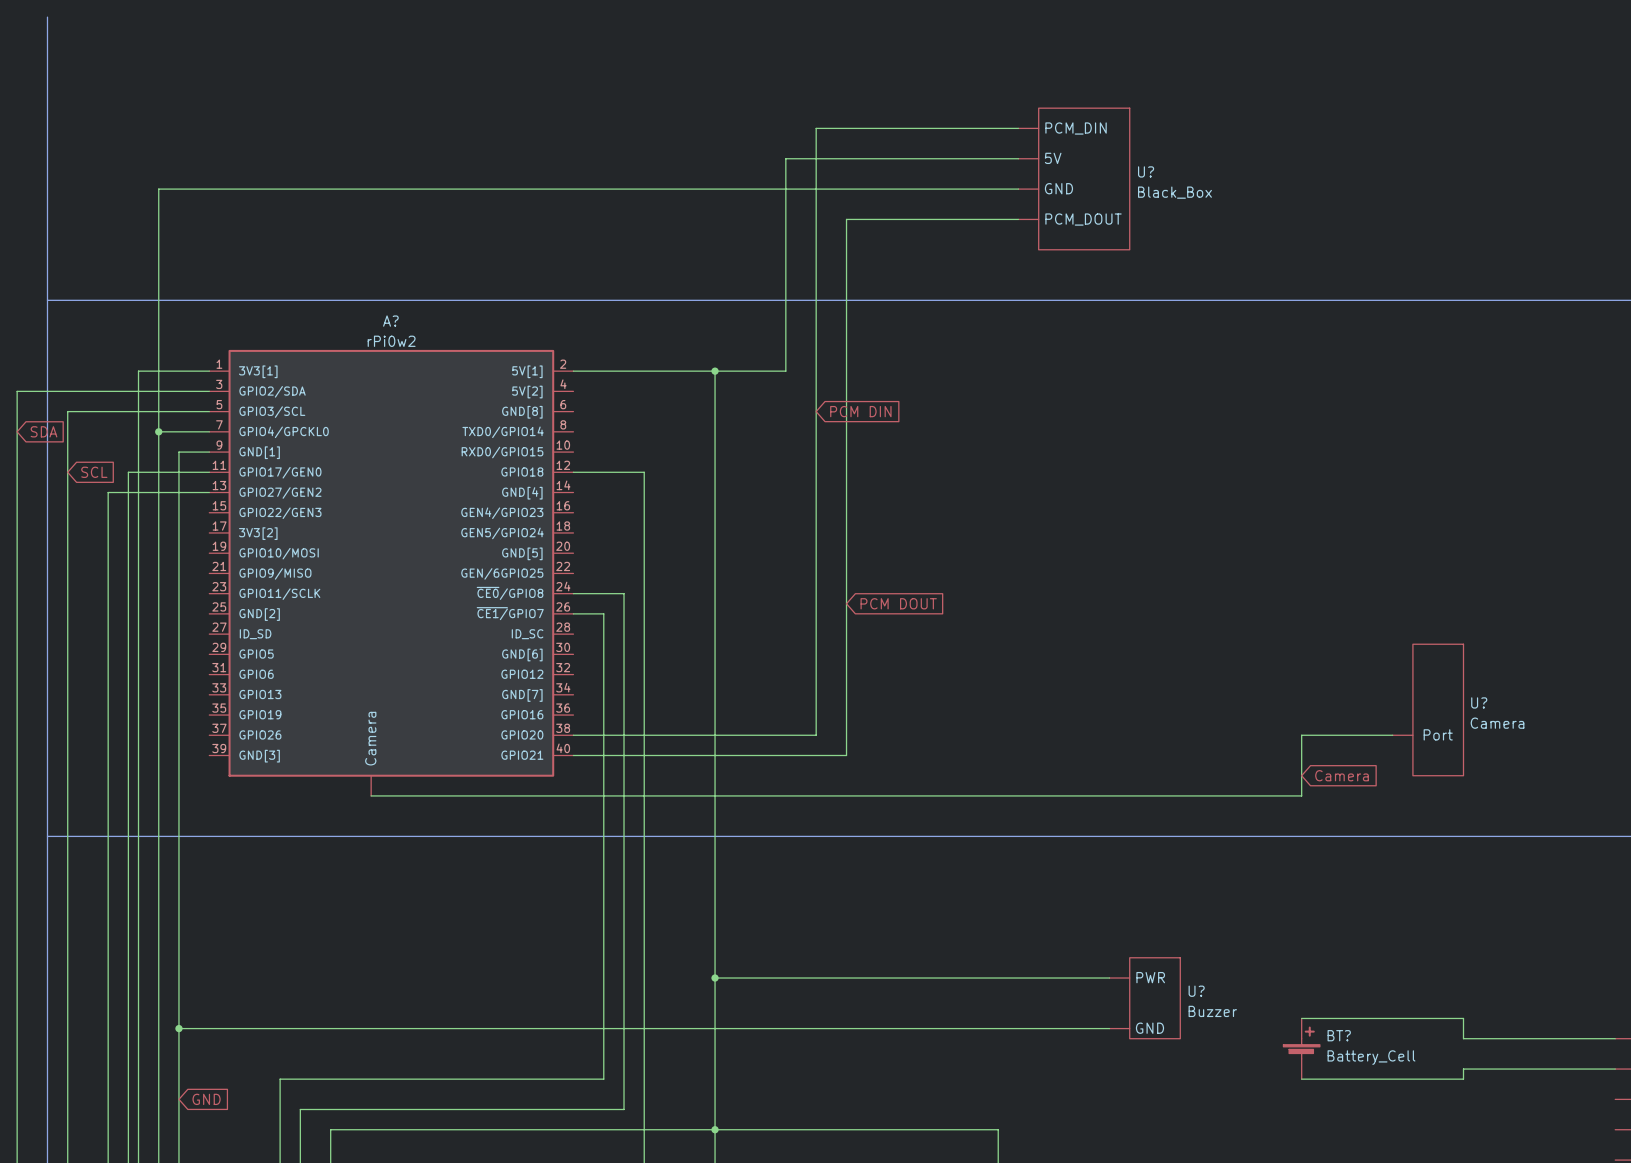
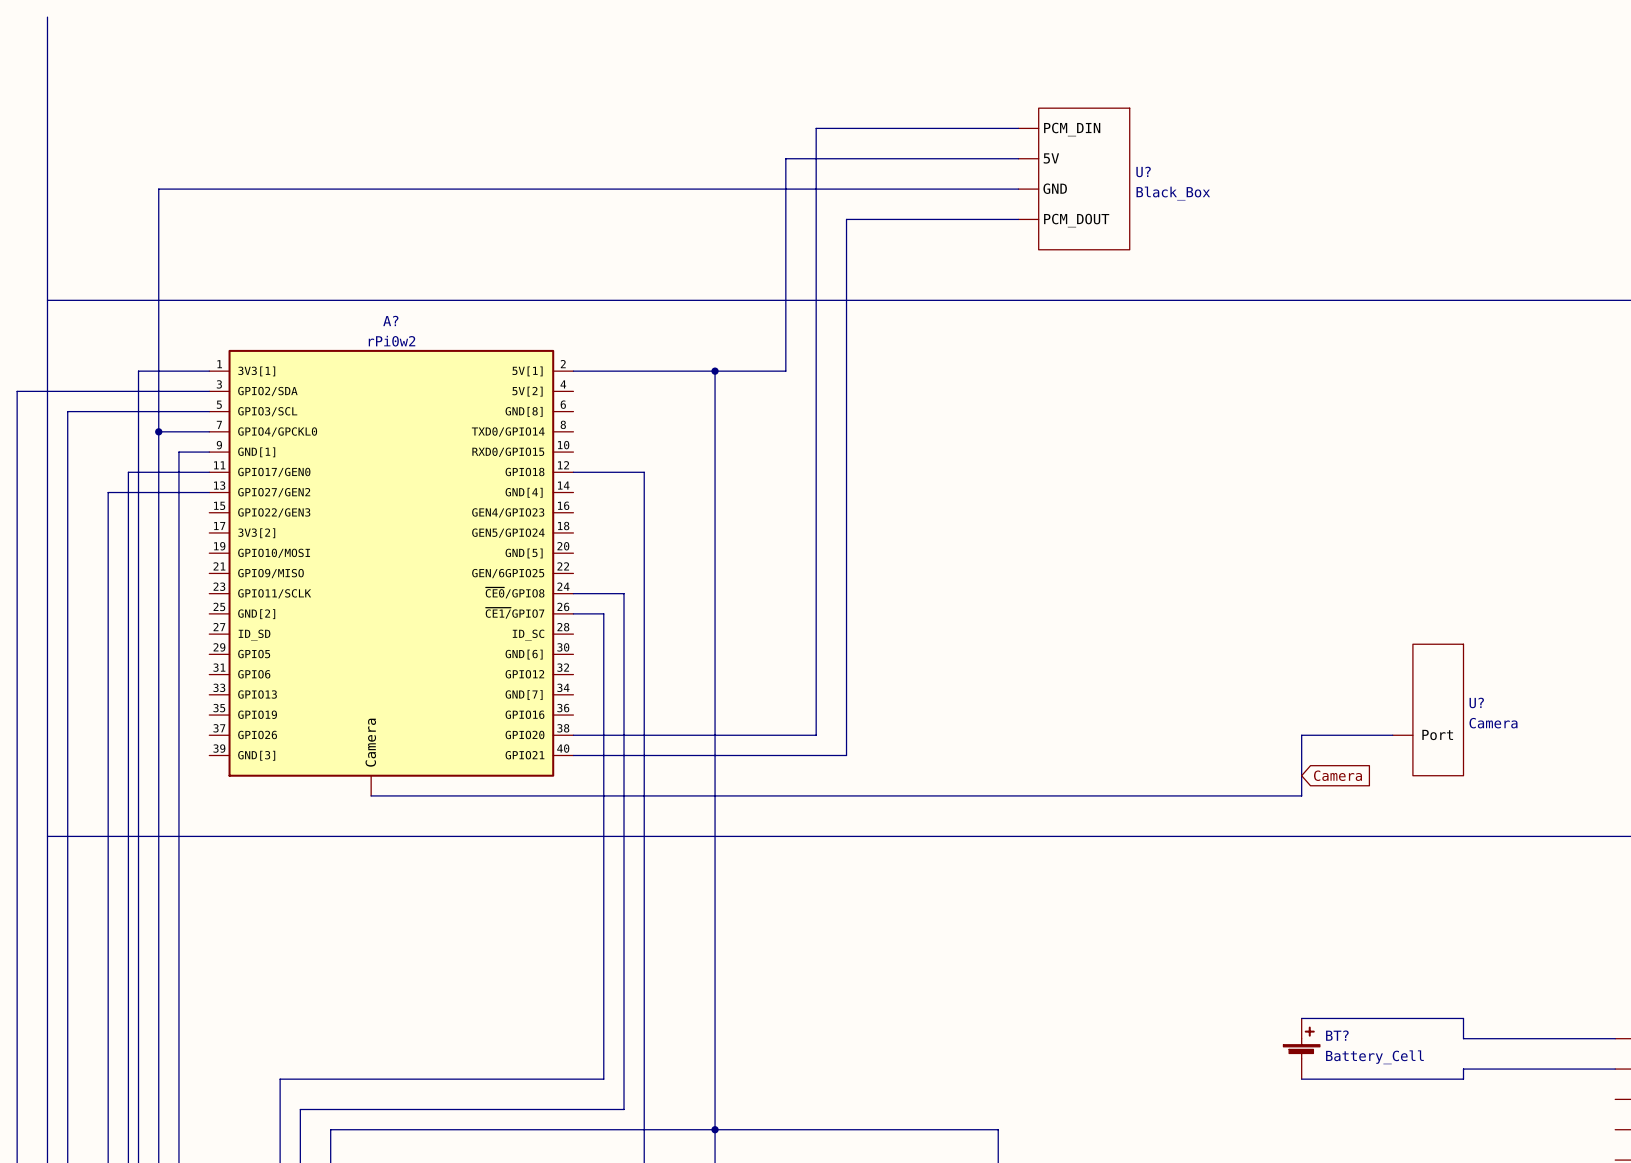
global label: PCM DIN (860, 411) -> none
global label: SDA (44, 431) -> none
global label: SCL (94, 472) -> none
global label: PCM DOUT (898, 603) -> none
wire: (715, 978) (1109, 978) -> none
junction: (715, 978) -> none
U?: Buzzer (1145, 998) -> none
wire: (178, 1028) (1109, 1028) -> none
junction: (178, 1028) -> none
global label: GND (206, 1099) -> none

